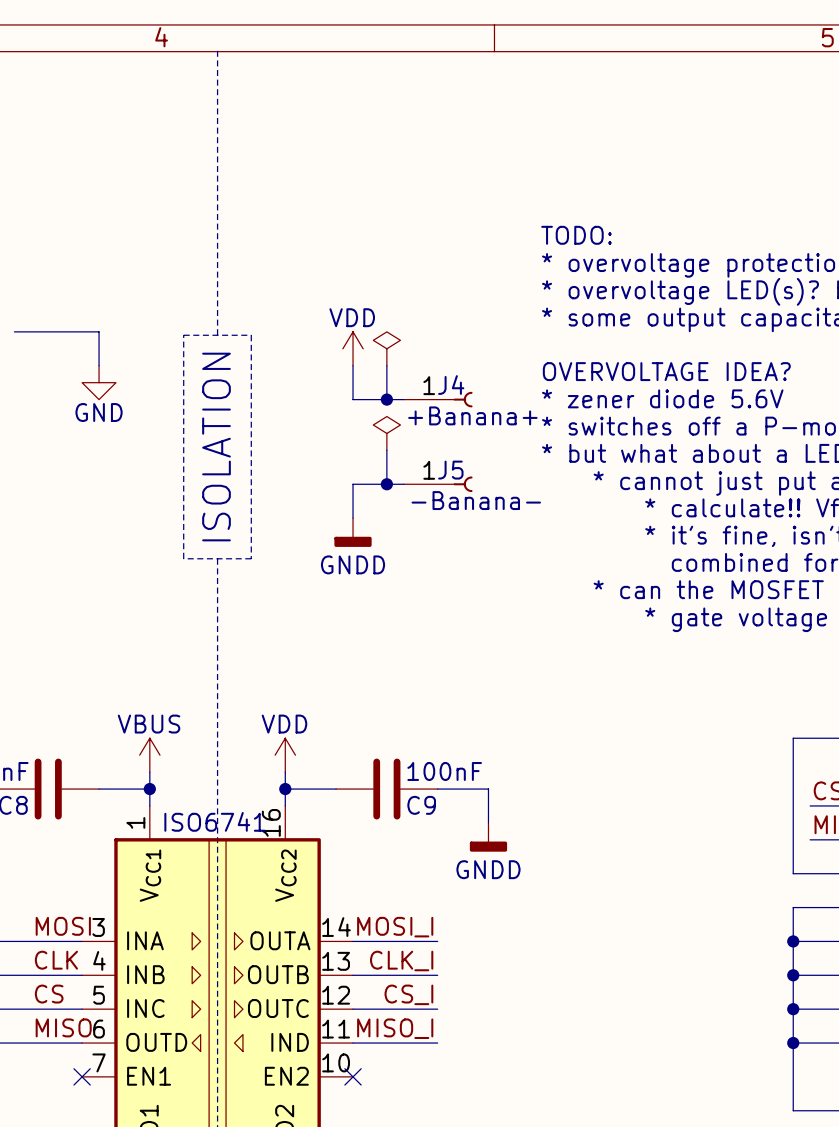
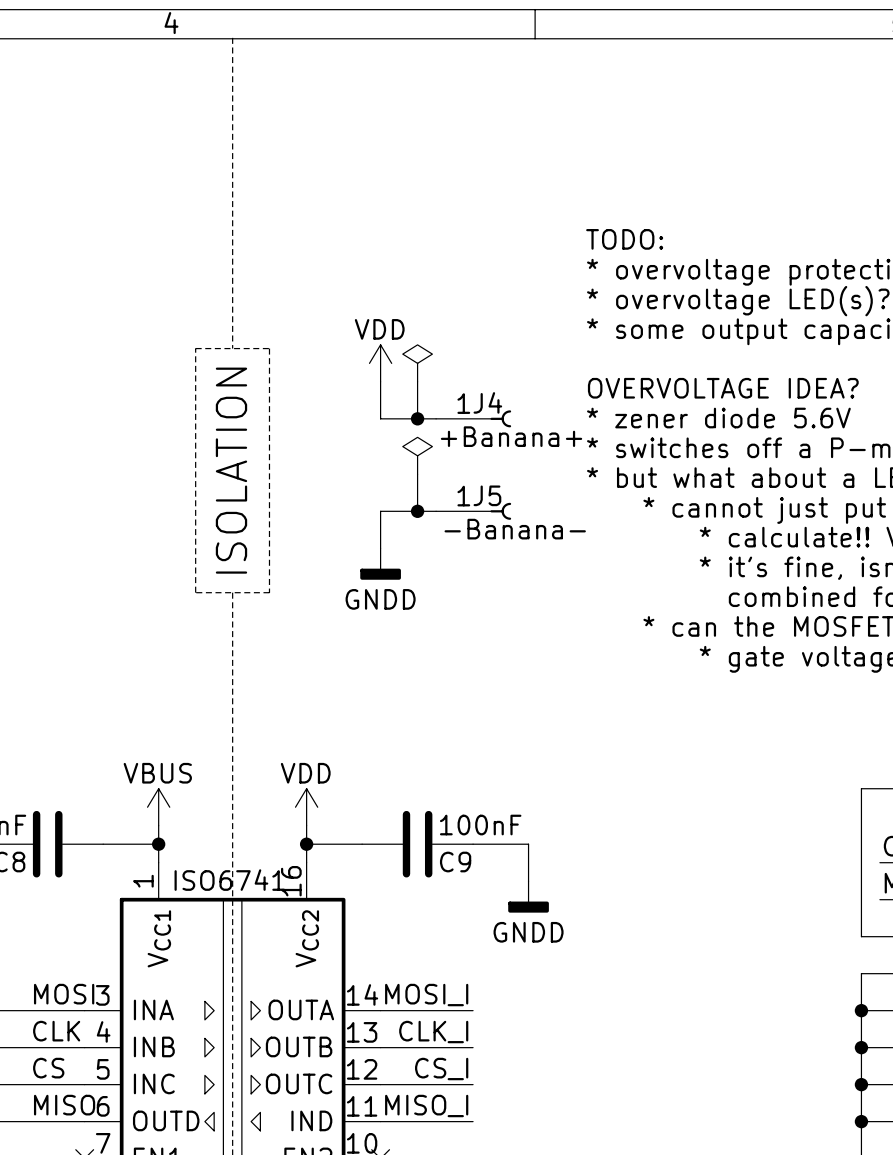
wire: (14, 331) (99, 331) (99, 365) -> none
power symbol: GND (99, 382) -> none

